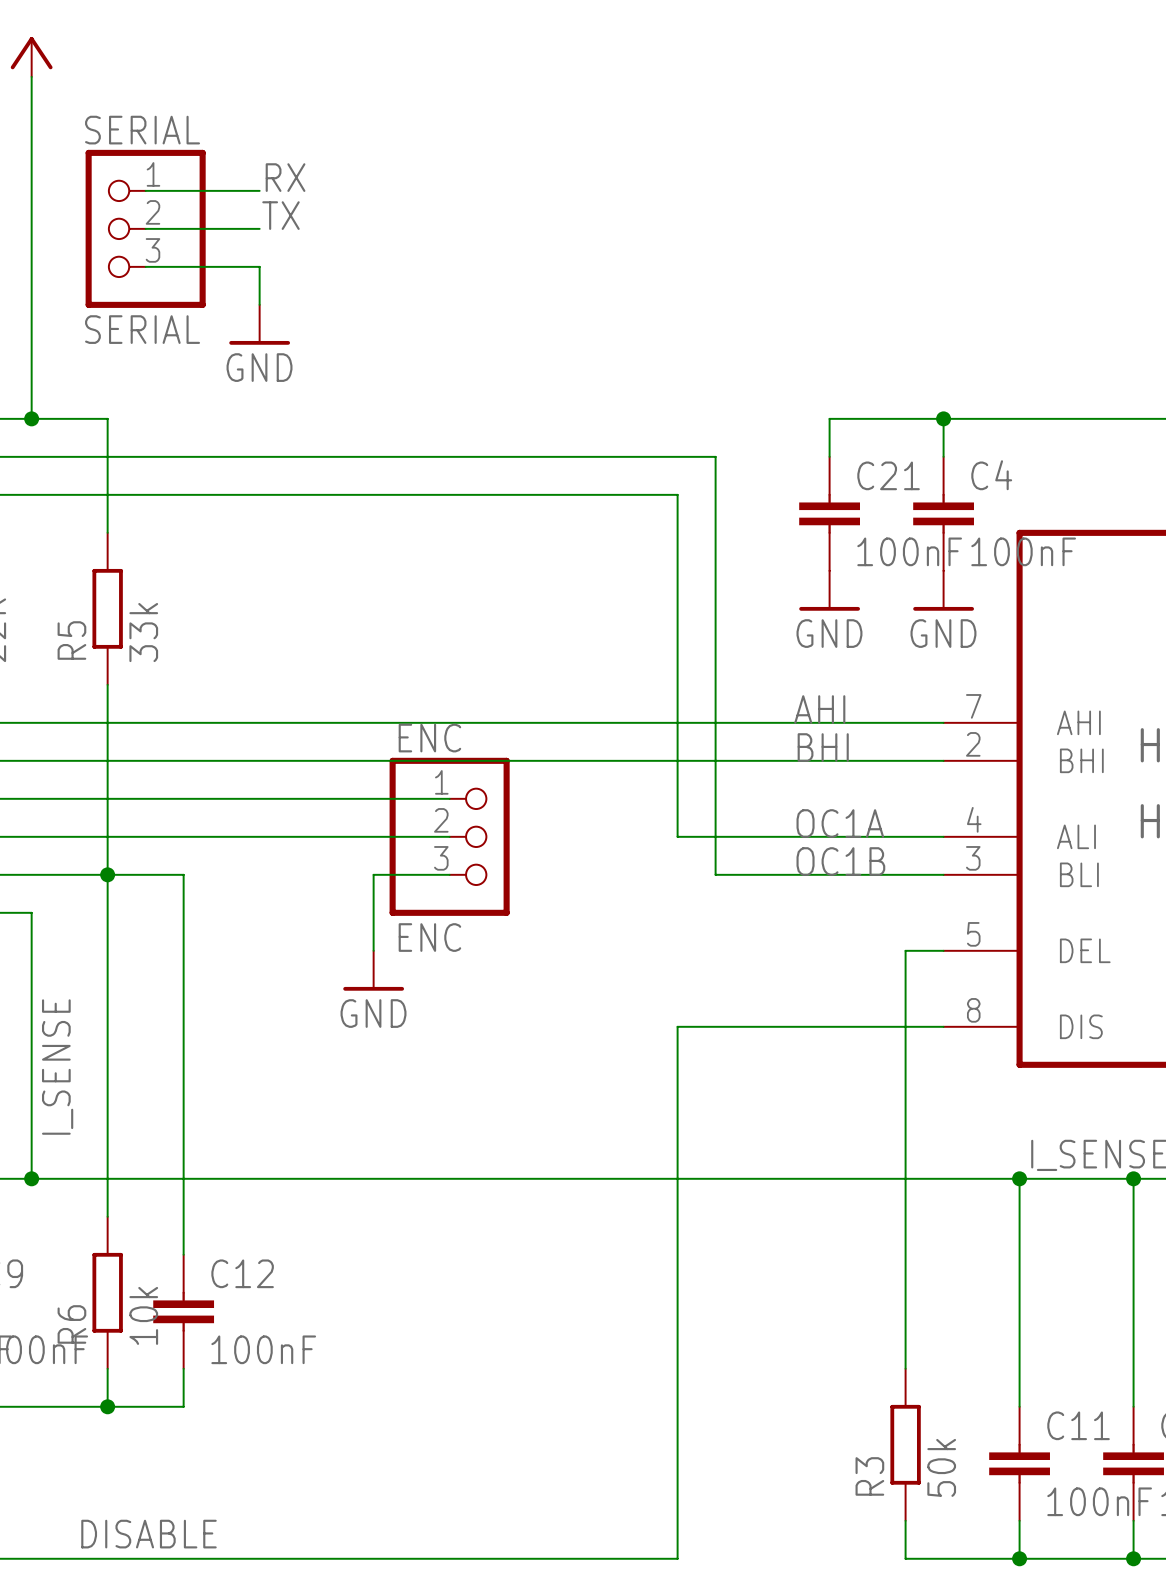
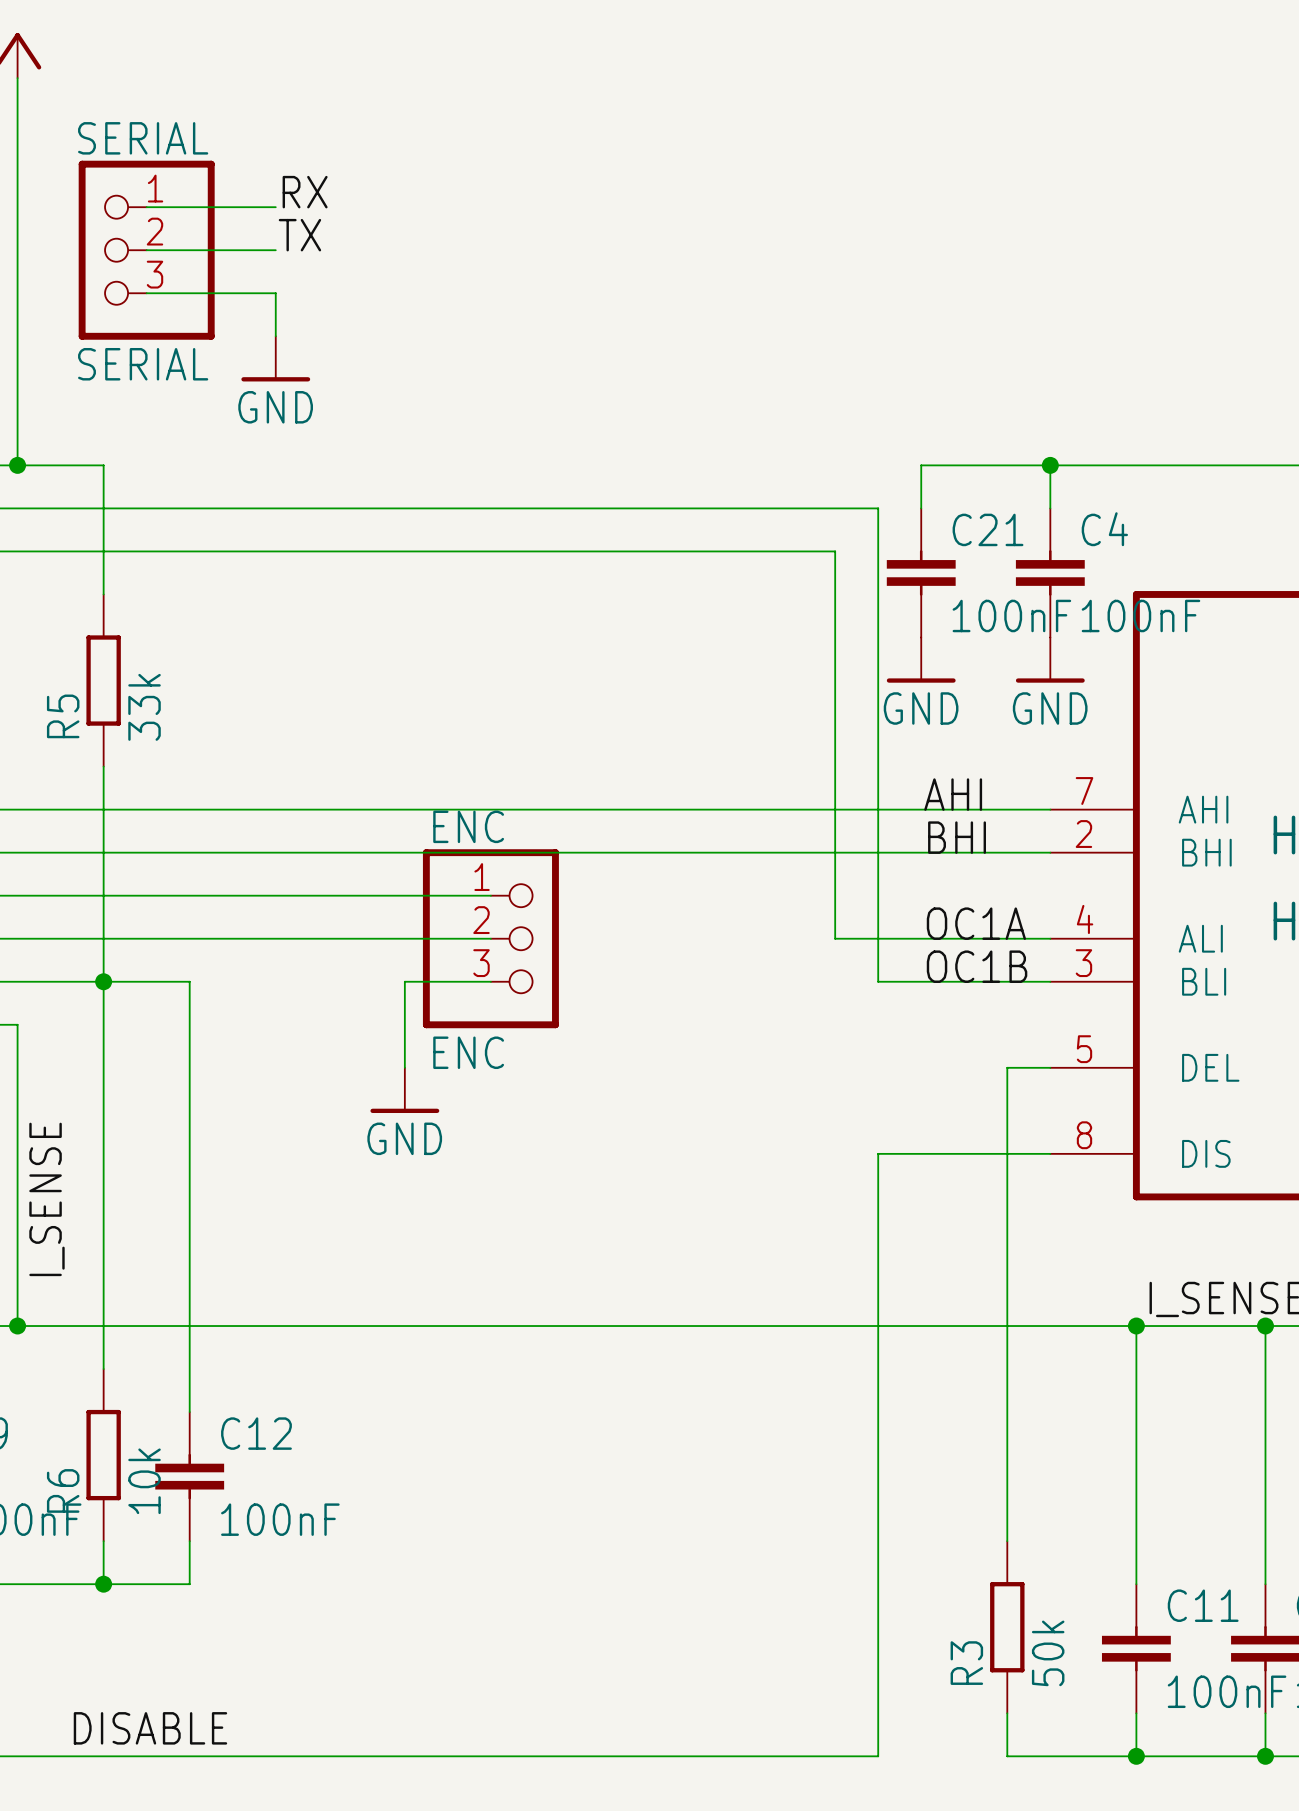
wire: (715, 456) (715, 874) (791, 874) -> (792, 508) (878, 508) (878, 981)
wire: (677, 494) (677, 836) (753, 836) -> (749, 551) (835, 551) (835, 938)
label position: AHI (819, 709) -> AHI (953, 794)
label position: BHI (823, 747) -> BHI (957, 837)
label position: OC1A (840, 823) -> OC1A (976, 923)
label position: OC1B (840, 861) -> OC1B (977, 966)
wire: (791, 1026) (677, 1026) (677, 1558) -> (878, 1153) (878, 1756) (749, 1756)

